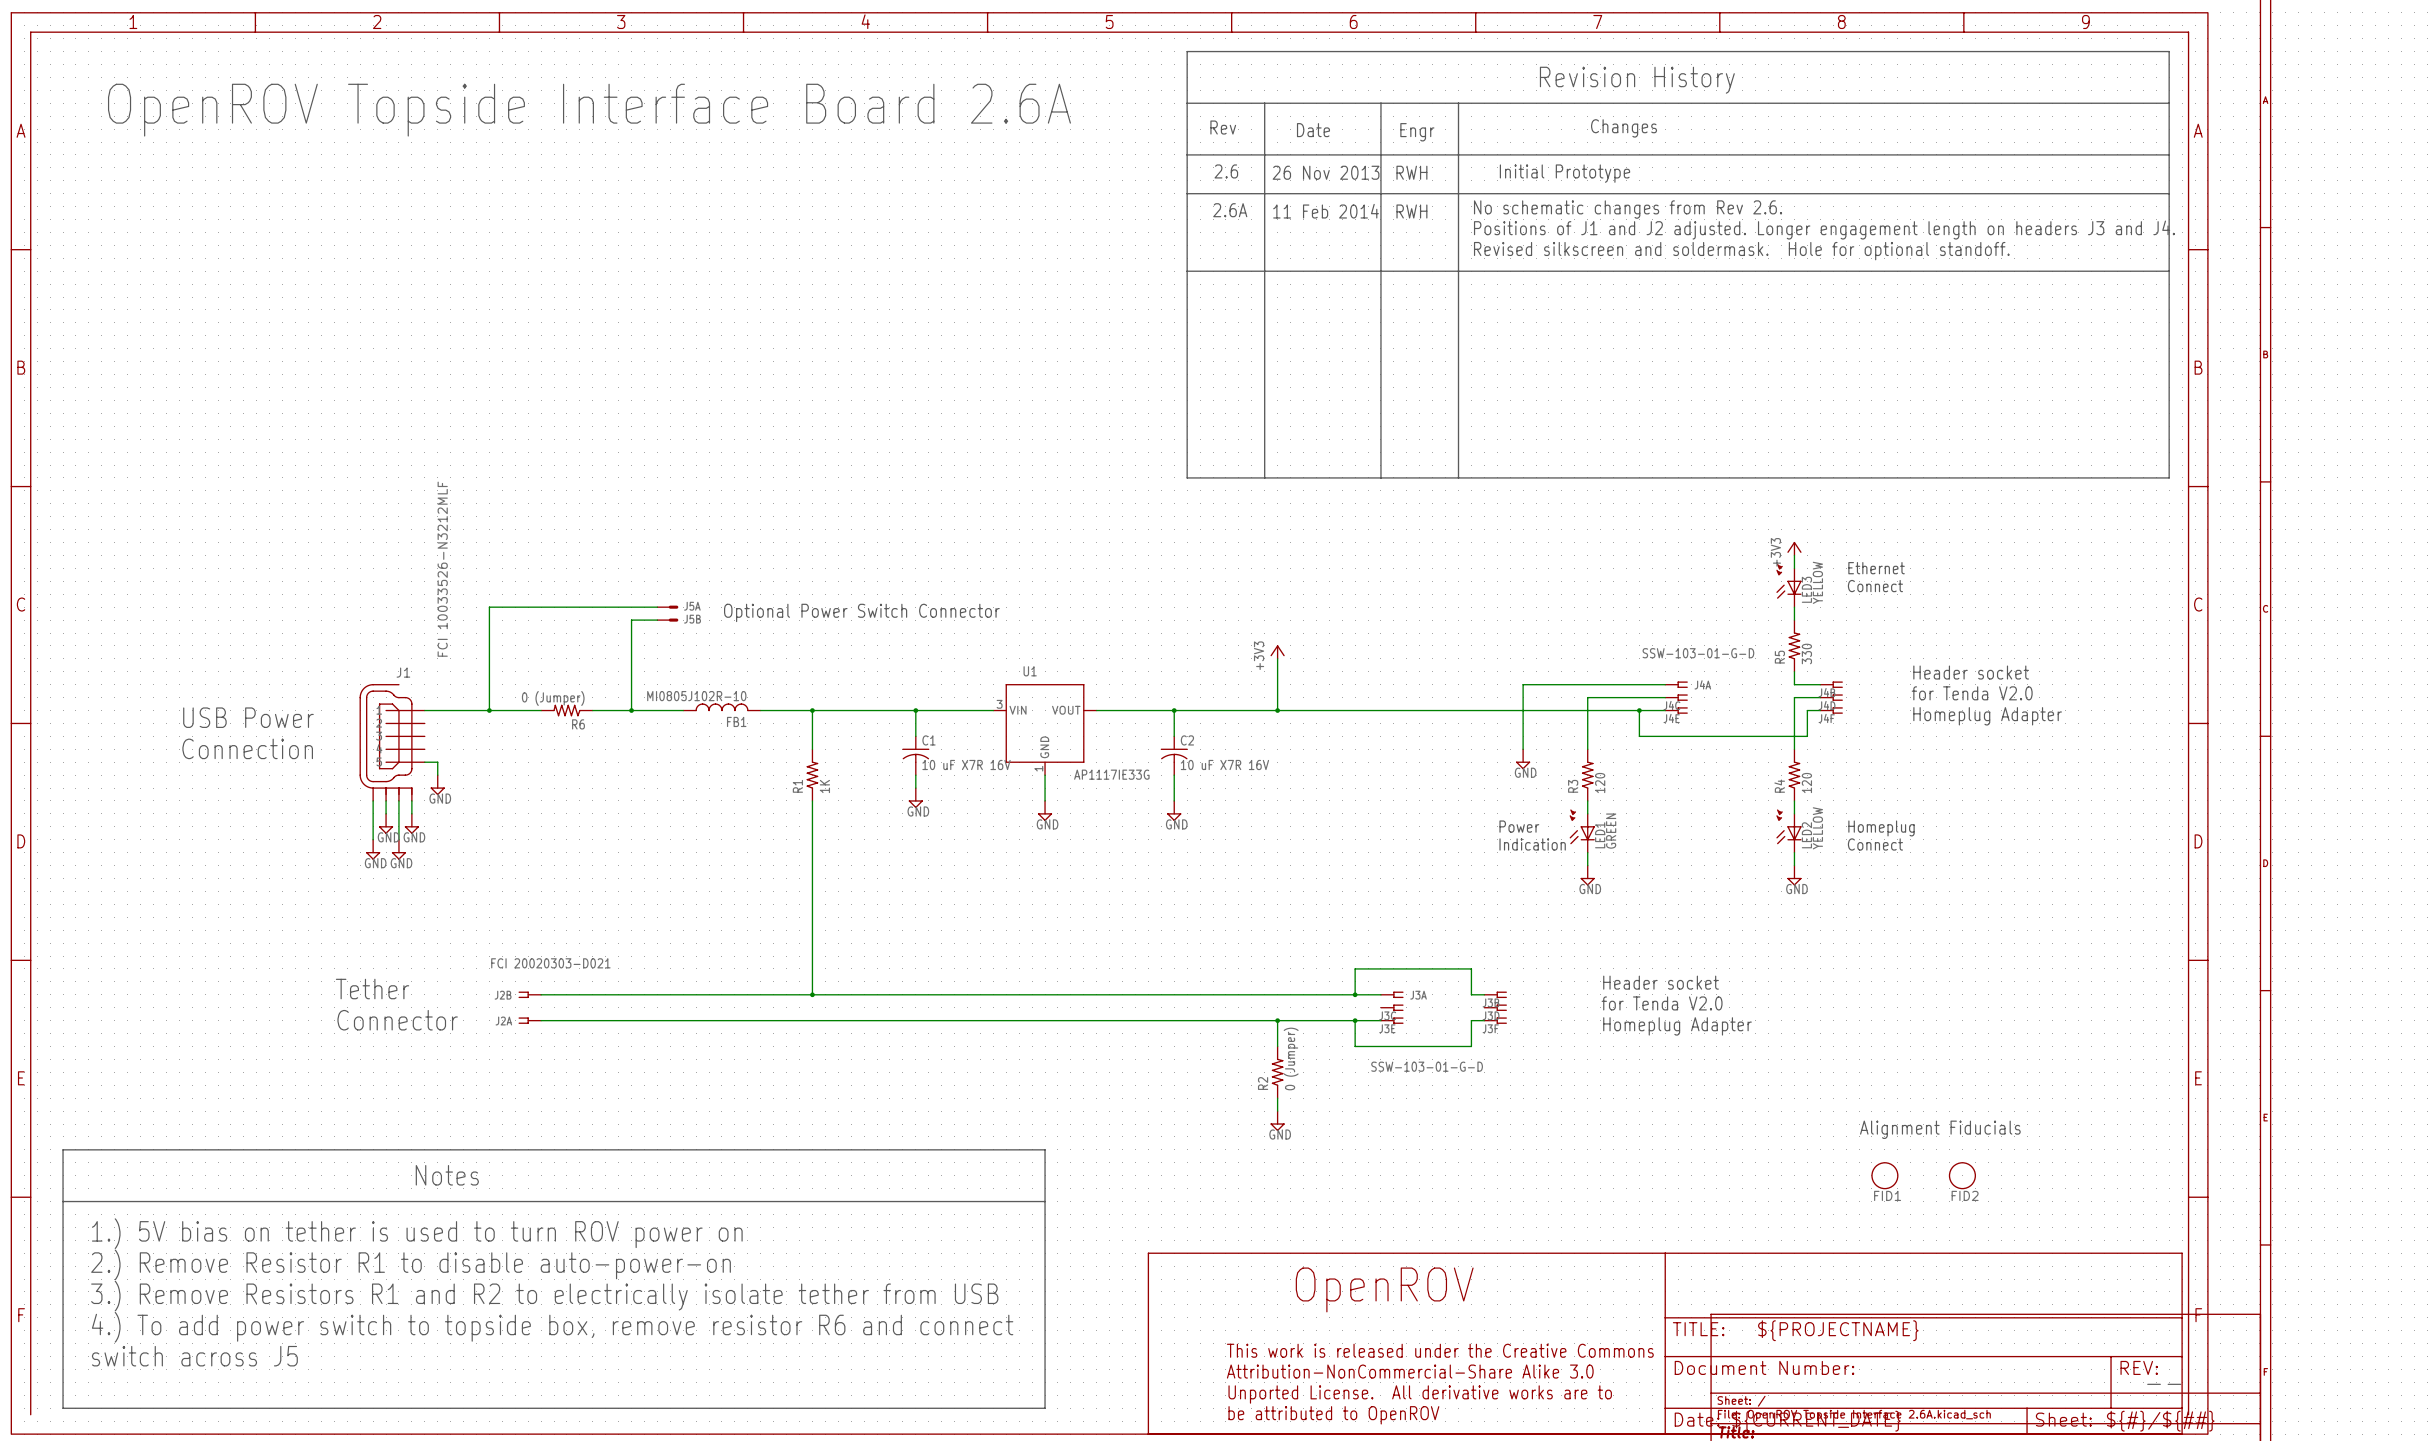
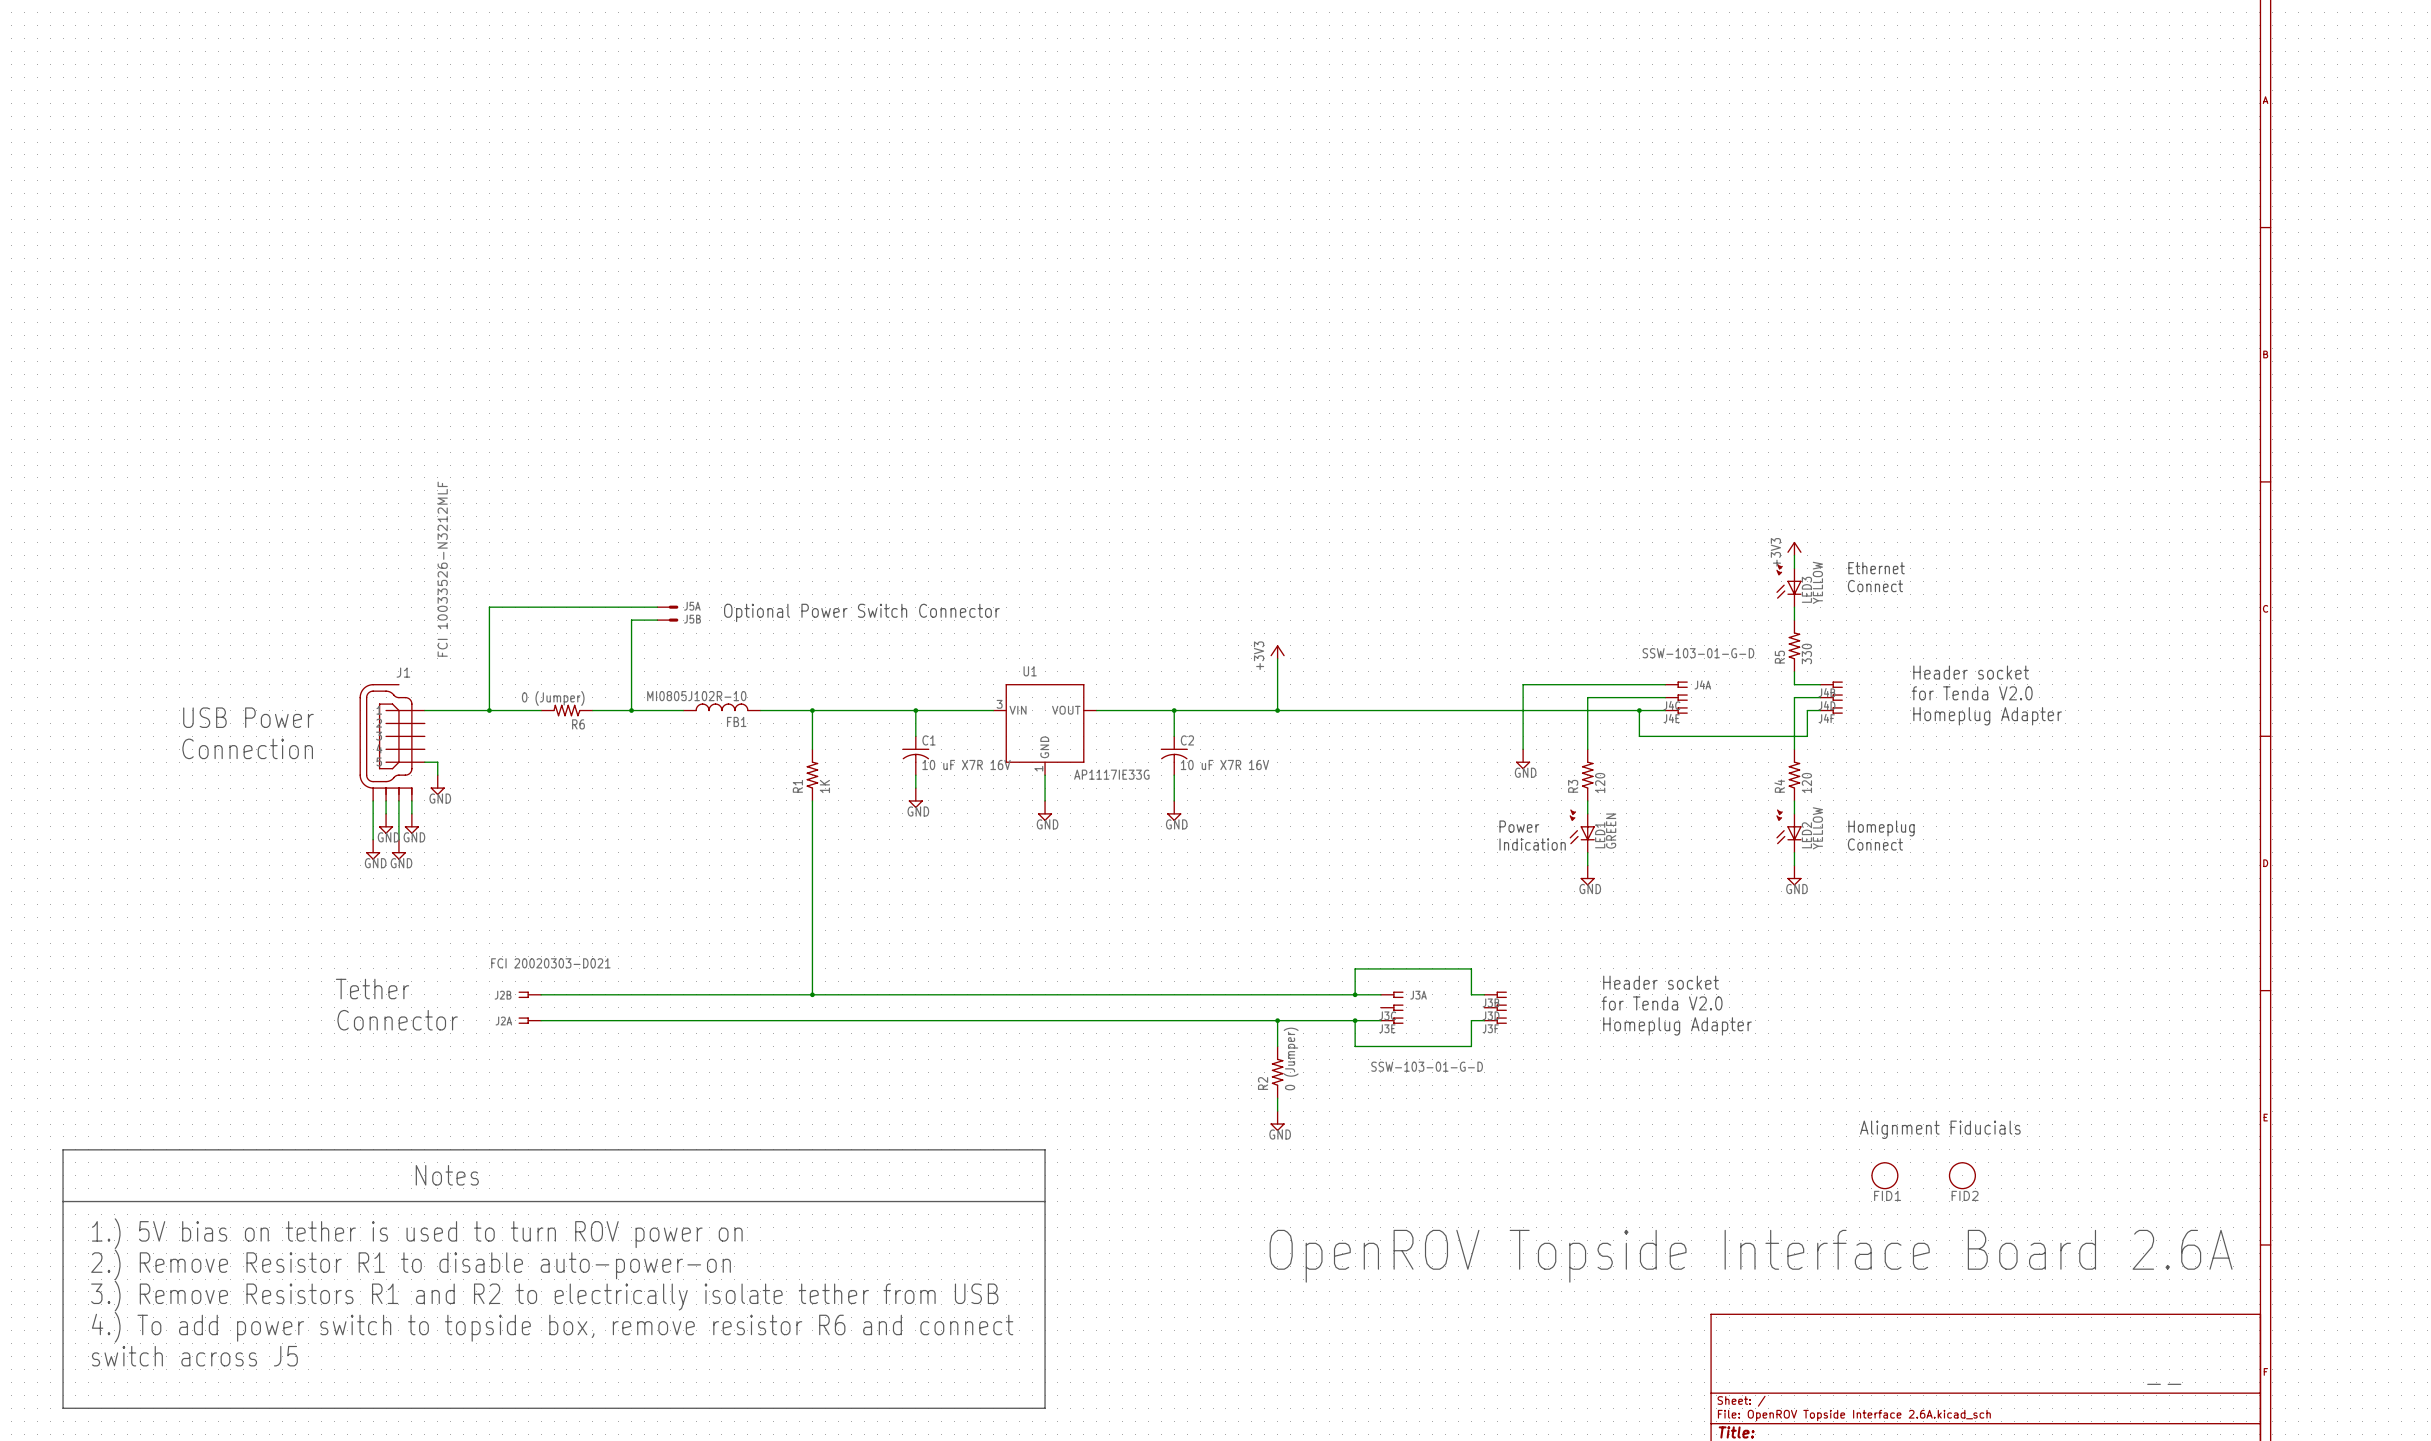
line: (1187, 51) (1187, 477) (2169, 477) (2169, 51) (1187, 51) -> none
text: Revision History (1637, 80) -> none
line: (1187, 103) (2169, 103) -> none
line: (1264, 103) (1264, 477) -> none
line: (1380, 103) (1380, 477) -> none
line: (1458, 103) (1458, 477) -> none
text: OpenROV Topside Interface Board 2.6A (589, 110) -> none
text: Rev (1223, 127) -> none
text: Changes (1624, 128) -> none
text: Date (1313, 130) -> none
text: Engr (1417, 132) -> none
line: (1187, 154) (2169, 154) -> none
text: 2.6 (1226, 171) -> none
text: 26 Nov 2013 (1326, 172) -> none
text: RWH (1411, 172) -> none
text: Initial Prototype (1564, 173) -> none
line: (1187, 193) (2169, 193) -> none
text: No schematic changes from Rev 2.6. (1628, 209) -> none
text: 2.6A (1230, 210) -> none
text: 11 Feb 2014 (1326, 211) -> none
text: RWH (1411, 211) -> none
text: Positions of J1 and J2 adjusted. Longer engagement length on headers J3 and J4. (1824, 230) -> none
text: Revised silkscreen and soldermask. Hole for optional standoff. (1741, 251) -> none
line: (1187, 271) (2169, 271) -> none
power symbol: (1109, 723) -> none
text: none -> OpenROV Topside Interface Board 2.6A (1751, 1256)
power symbol: (1665, 1343) -> none

